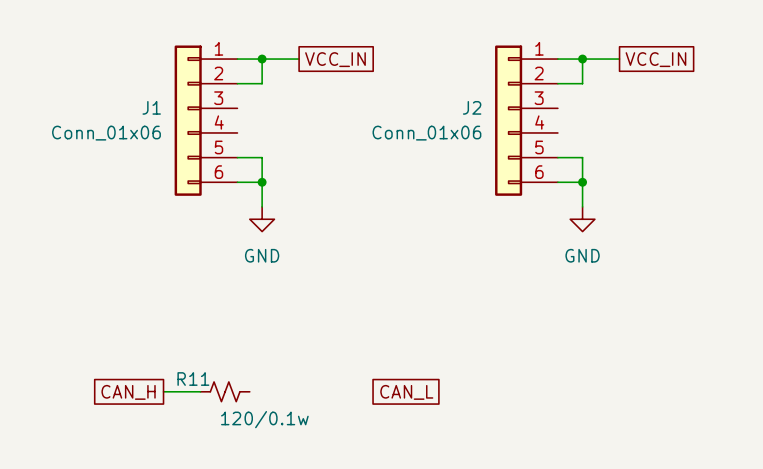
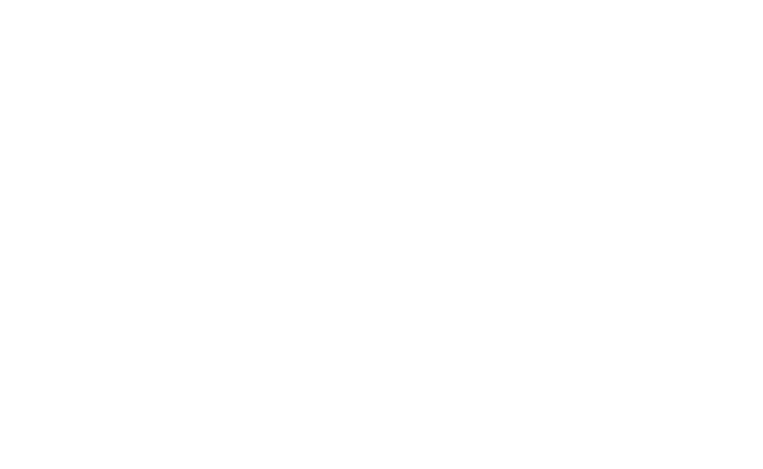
wire: (237, 59) (299, 59) -> none
wire: (262, 59) (262, 83) (237, 83) -> none
junction: (262, 59) -> none
global label: VCC_IN (335, 59) -> none
wire: (557, 59) (619, 59) -> none
wire: (582, 59) (582, 83) (557, 83) -> none
junction: (582, 59) -> none
global label: VCC_IN (655, 59) -> none
J1: Conn_01x06 (206, 120) -> none
J2: Conn_01x06 (526, 120) -> none
wire: (237, 157) (262, 157) (262, 206) -> none
wire: (557, 157) (582, 157) (582, 206) -> none
wire: (237, 182) (262, 182) -> none
junction: (262, 182) -> none
wire: (557, 182) (582, 182) -> none
junction: (582, 182) -> none
power symbol: GND (262, 219) -> none
power symbol: GND (582, 219) -> none
wire: (163, 391) (200, 391) -> none
R11: 120/0.1w (225, 391) -> none
global label: CAN_H (128, 392) -> none
global label: CAN_L (406, 392) -> none

